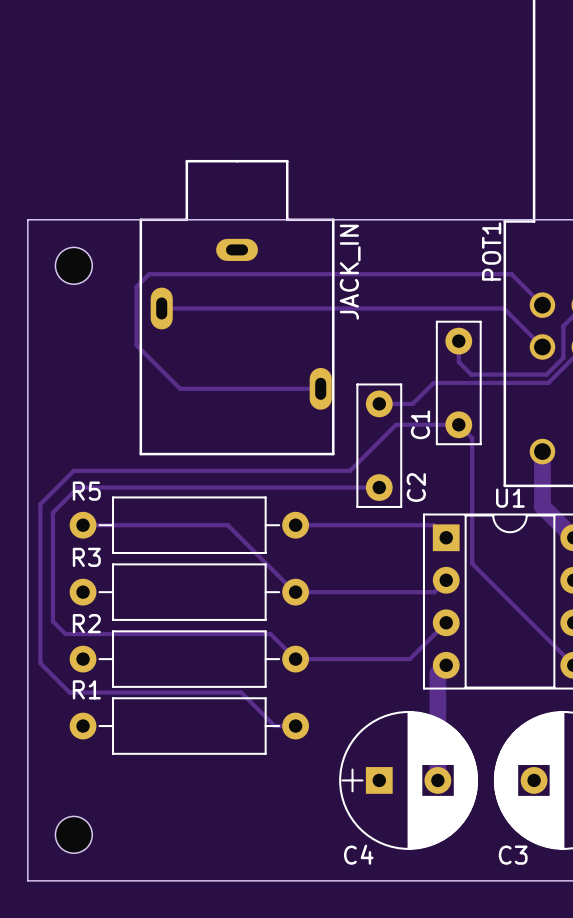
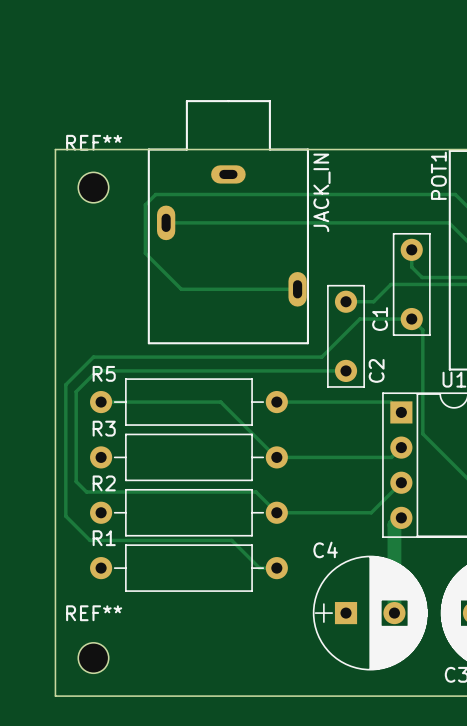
REF** name: none -> REF** (94, 142)
REF** name: none -> REF** (94, 613)
C4 name position: C4 (358, 854) -> C4 (325, 549)

